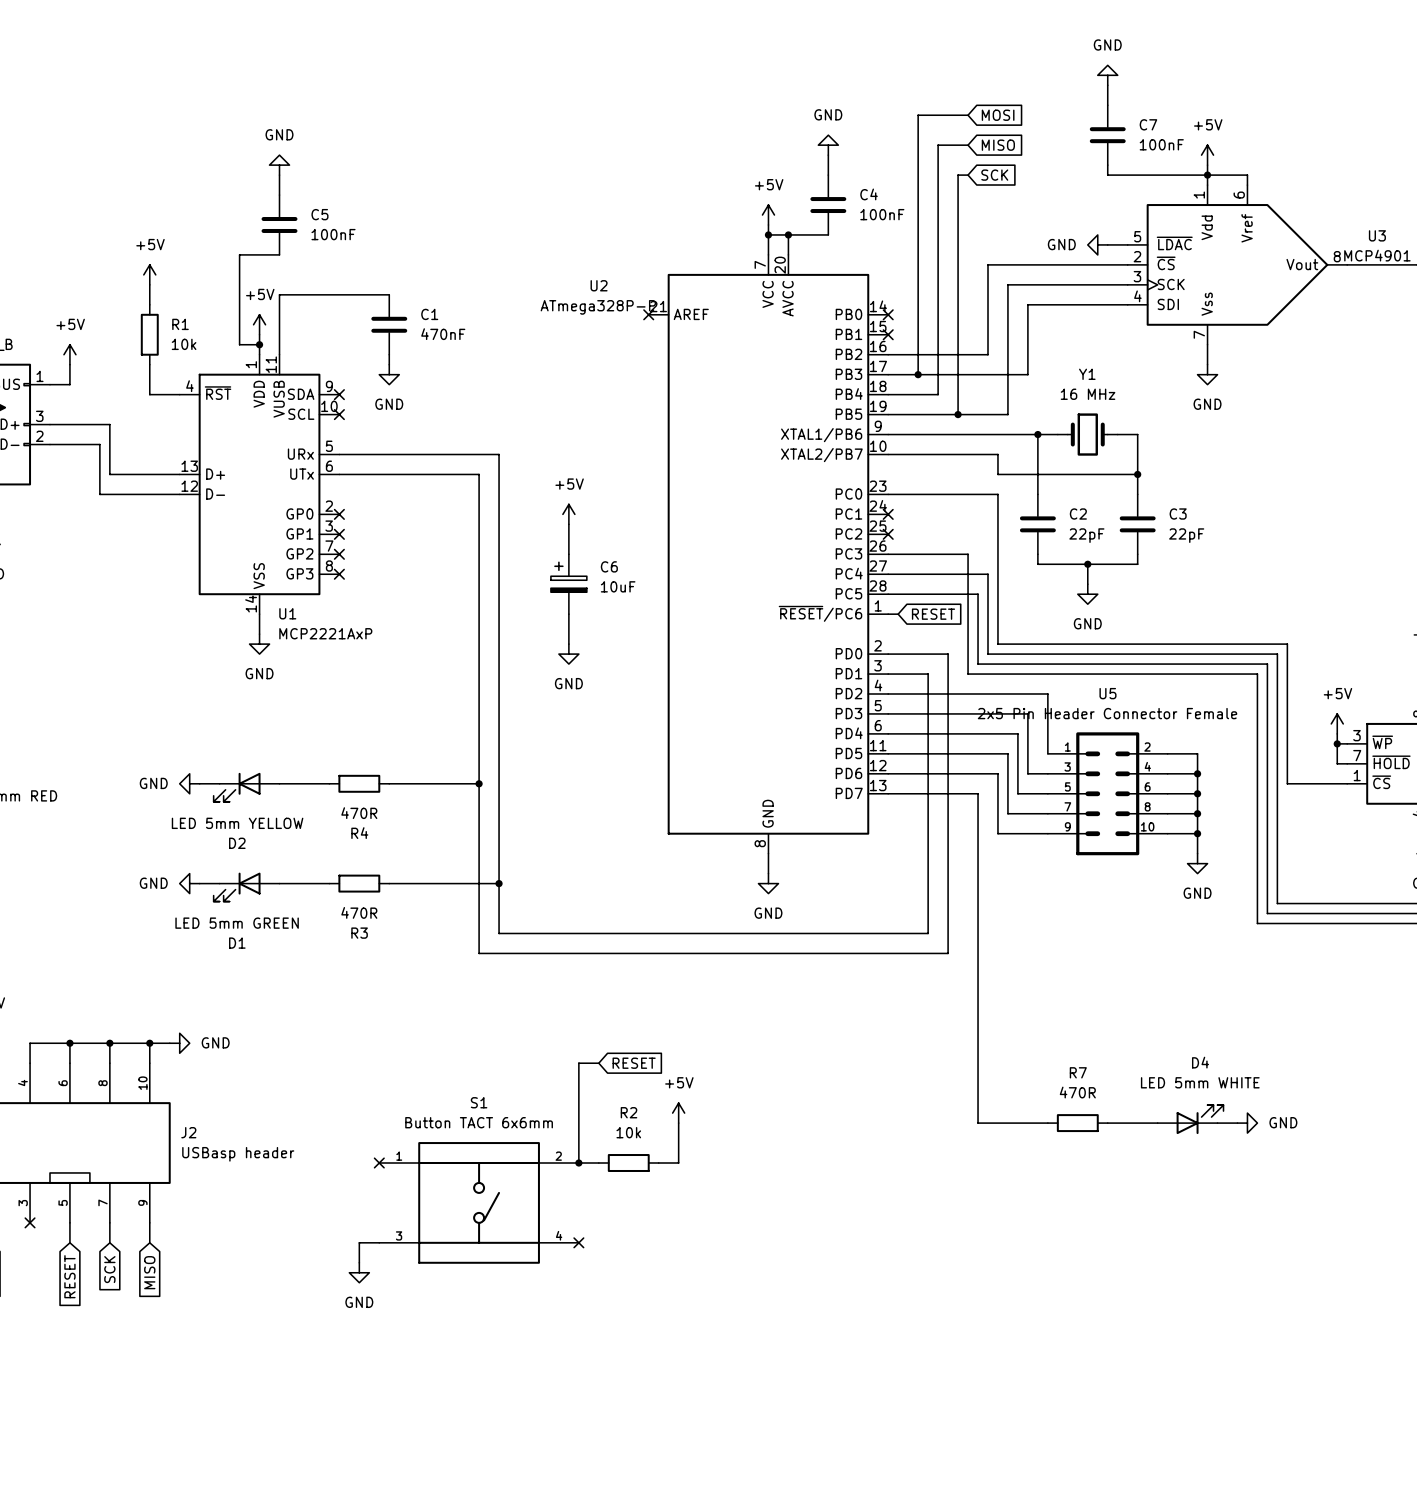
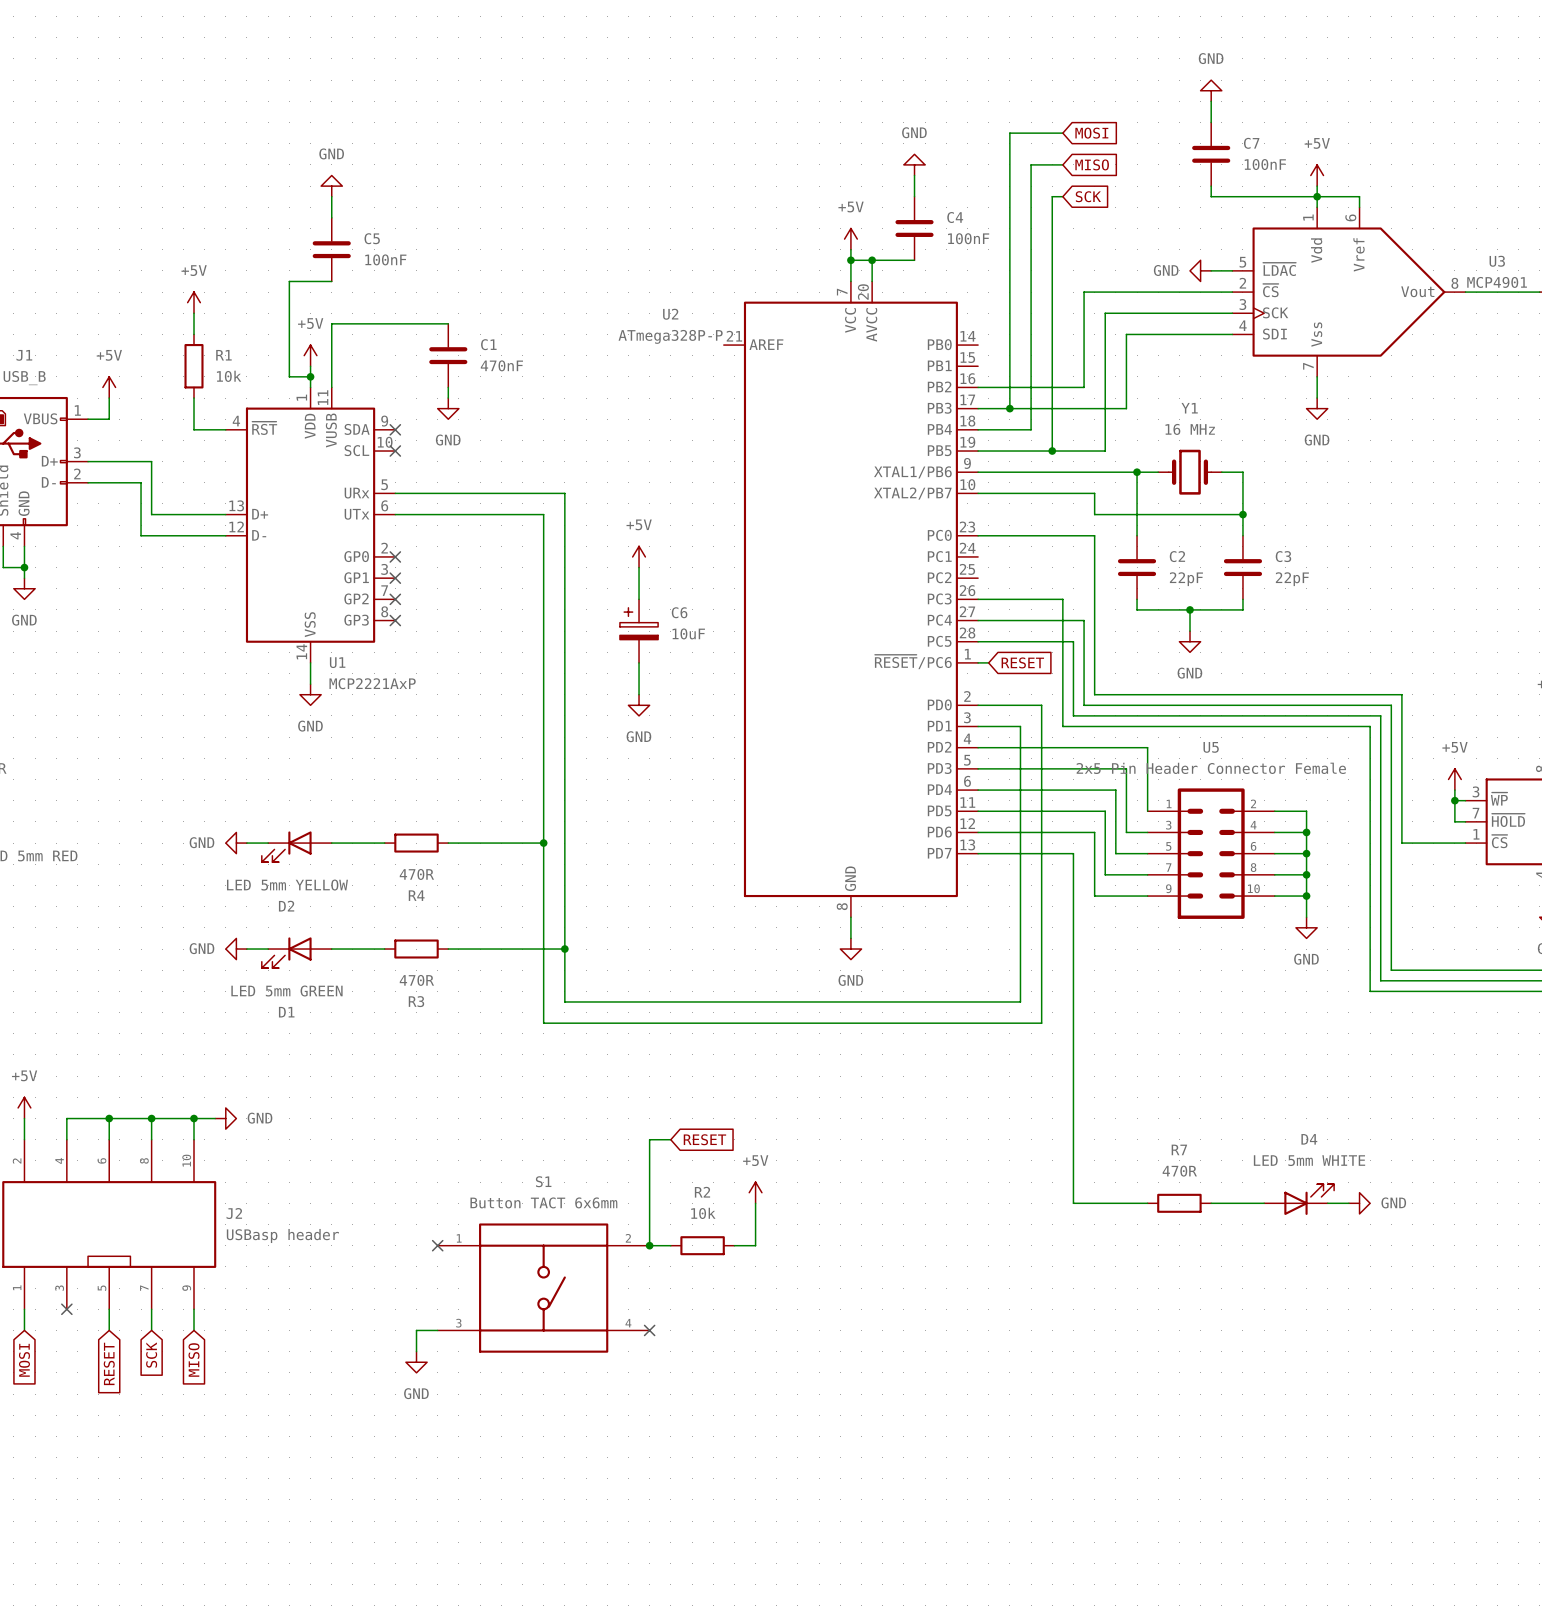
no-connect mark: (648, 314) -> none
no-connect mark: (888, 314) -> none
no-connect mark: (888, 334) -> none
no-connect mark: (888, 514) -> none
no-connect mark: (888, 534) -> none

